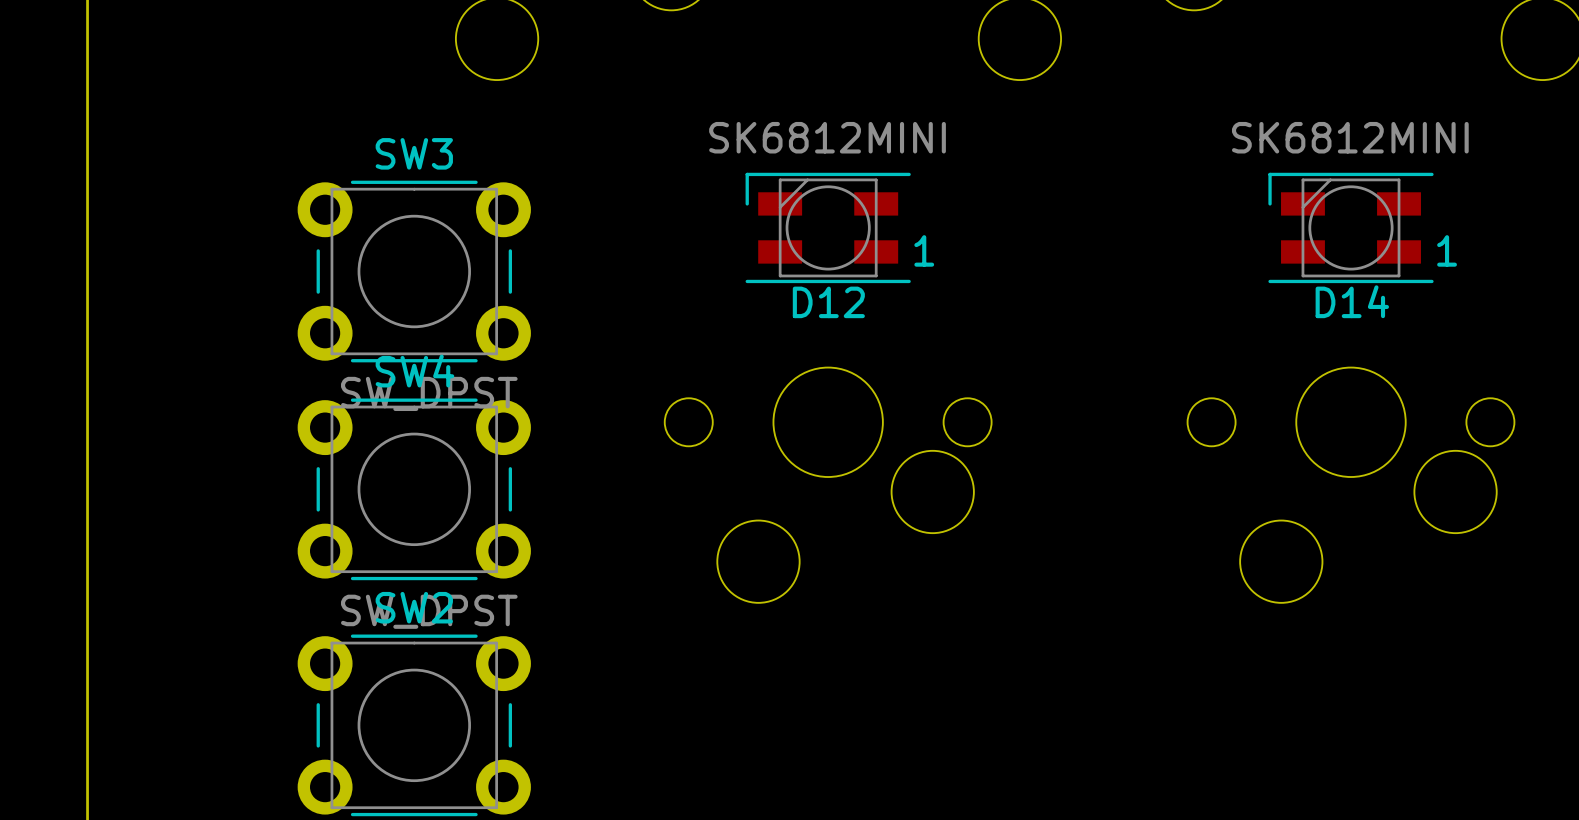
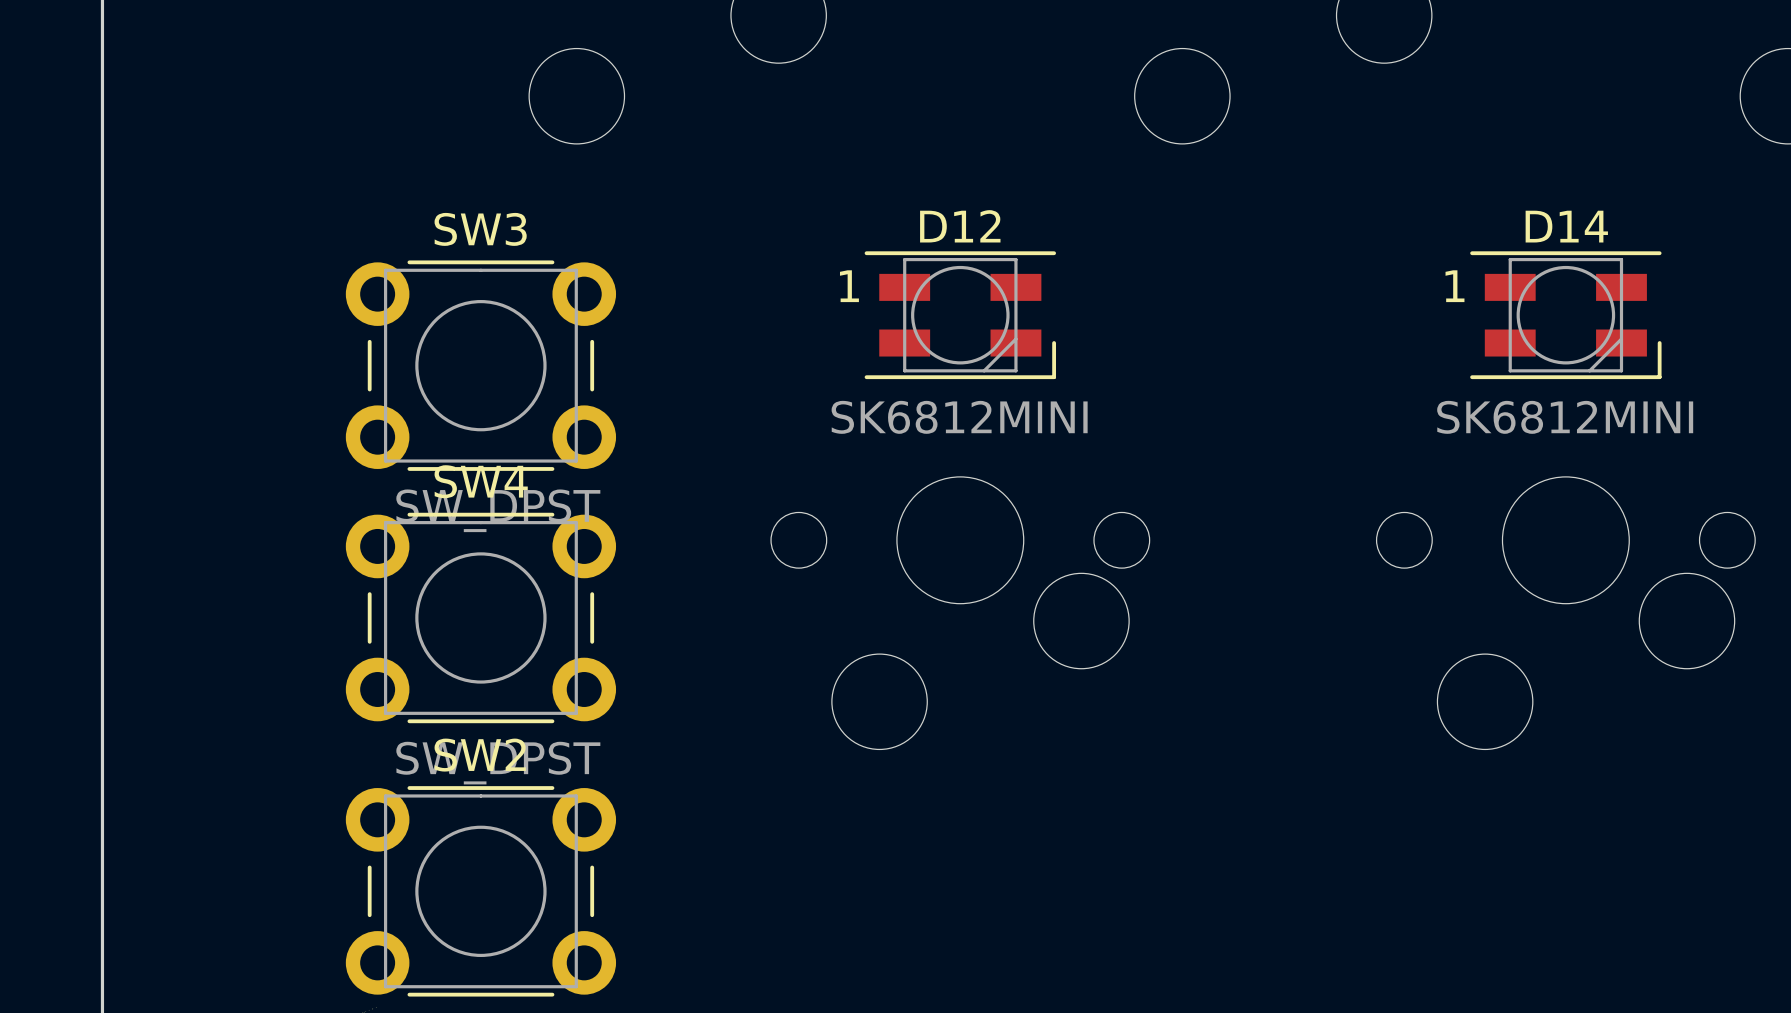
D12 rotation: 0° (828, 227) -> 180° (960, 315)
D14 rotation: 0° (1350, 227) -> 180° (1565, 315)

